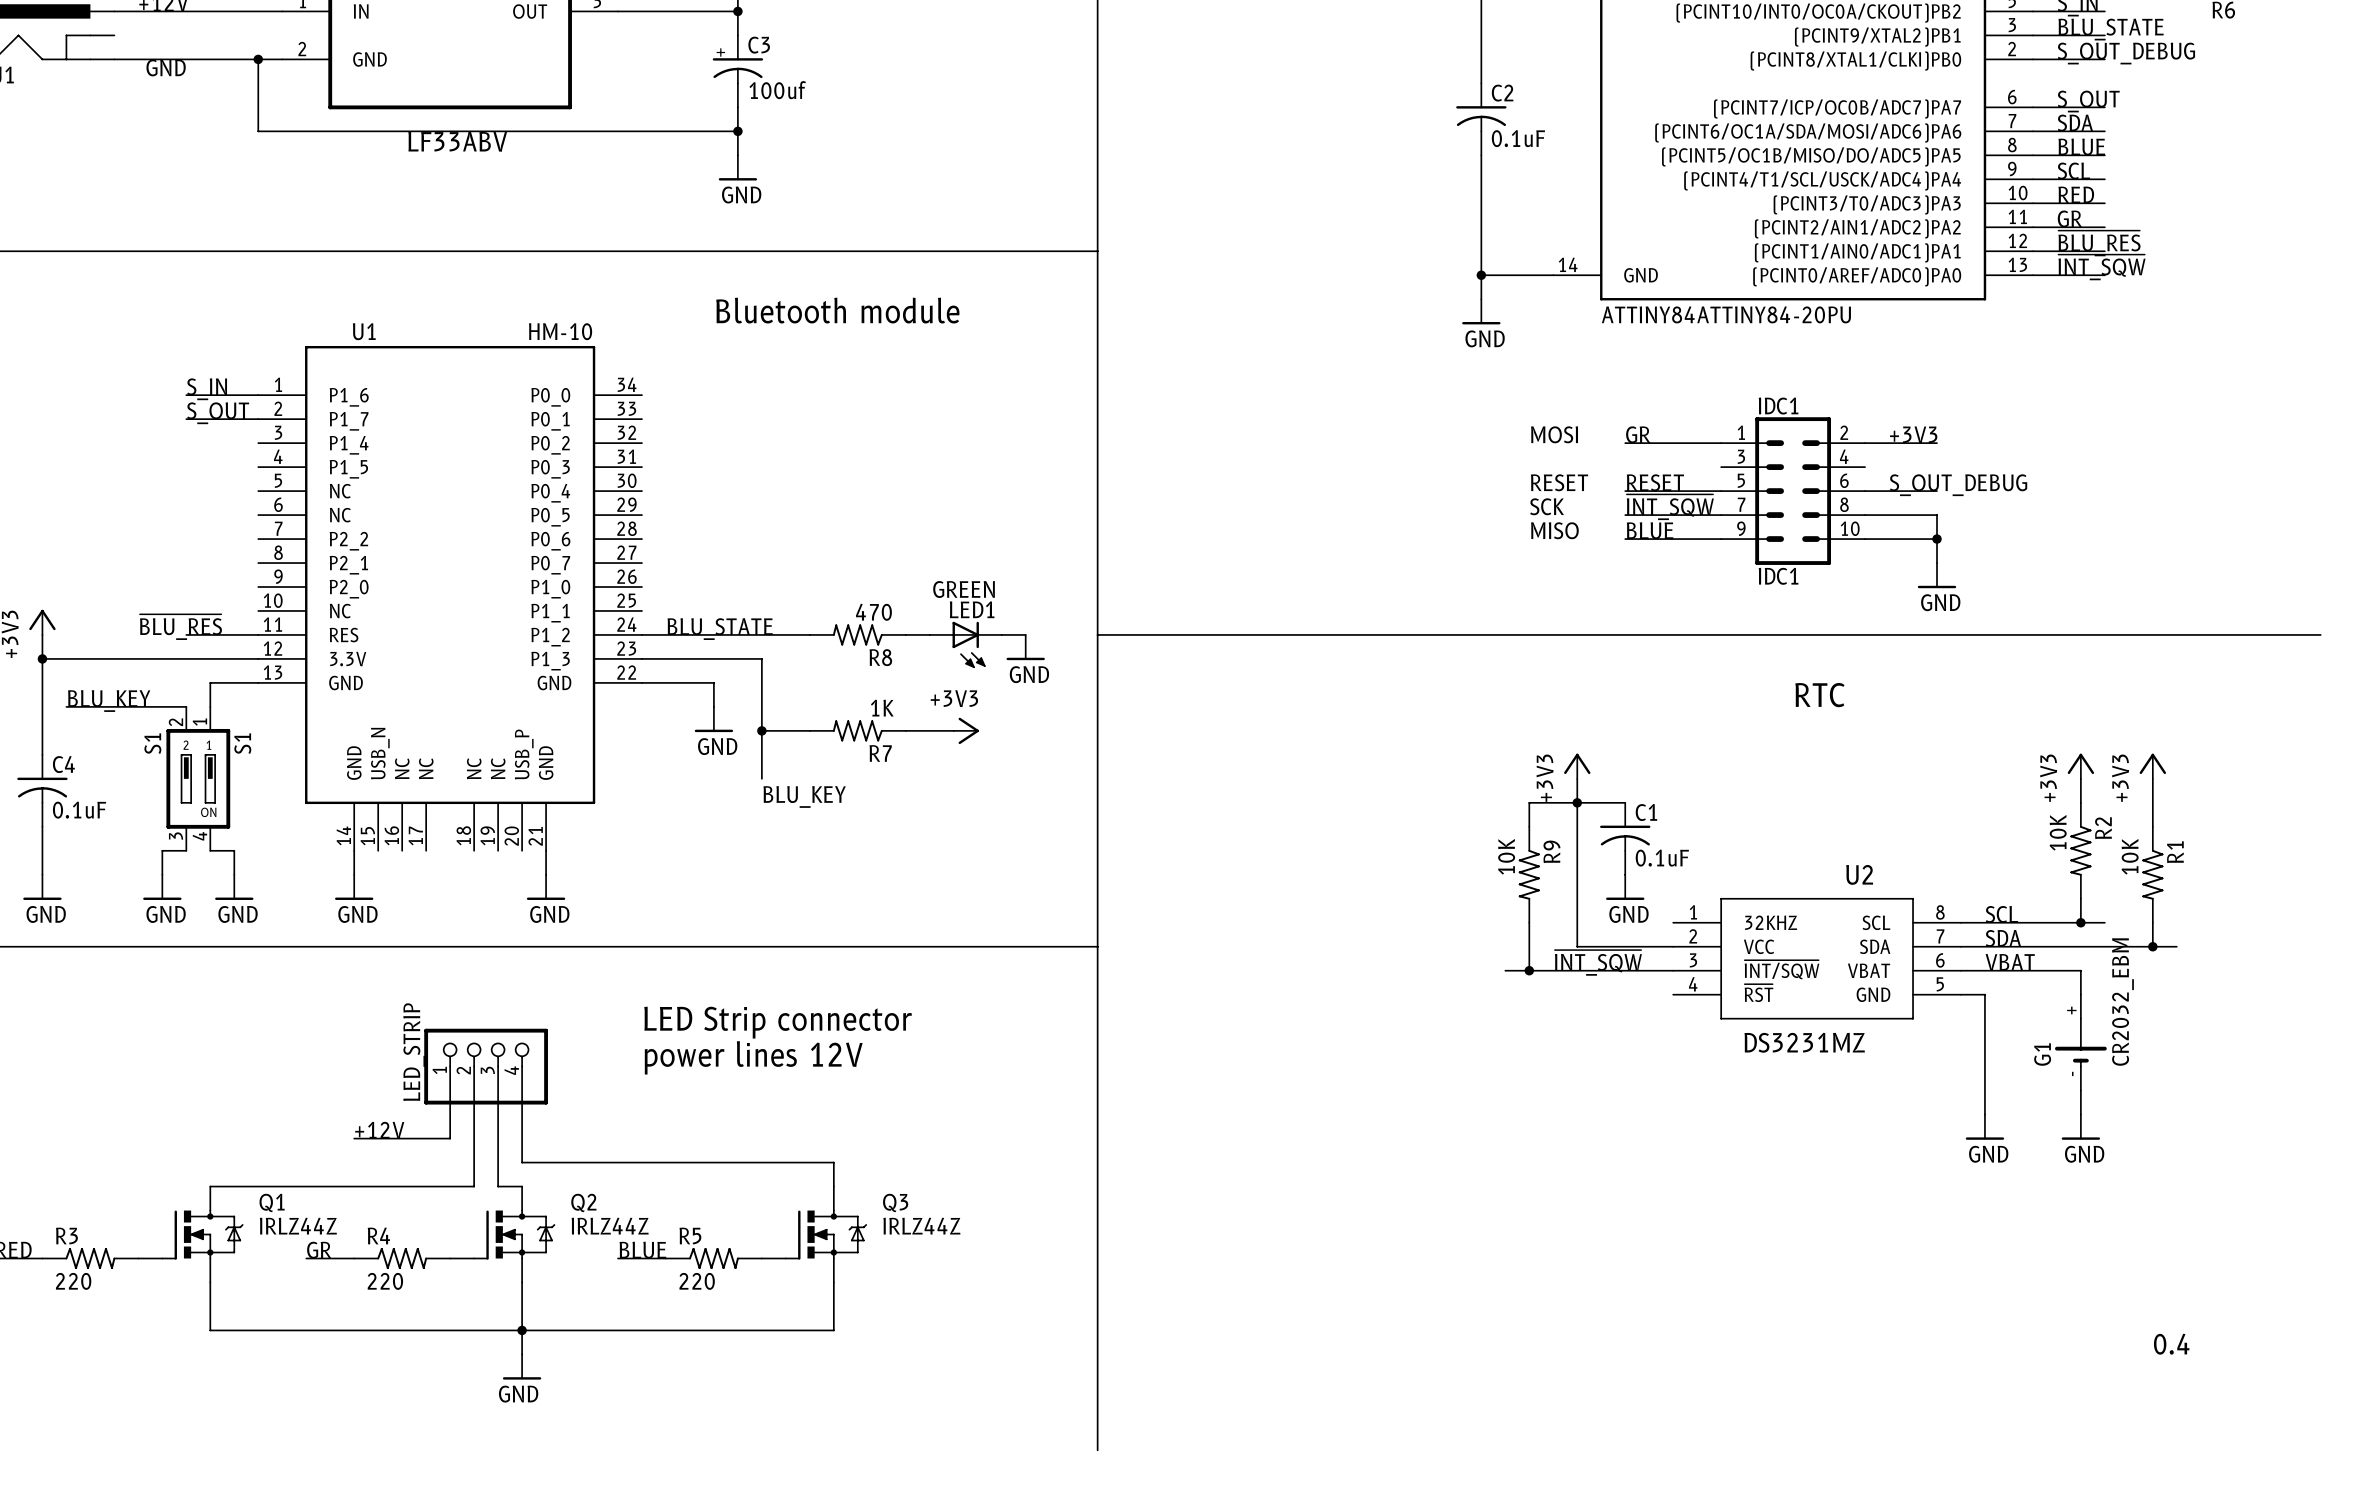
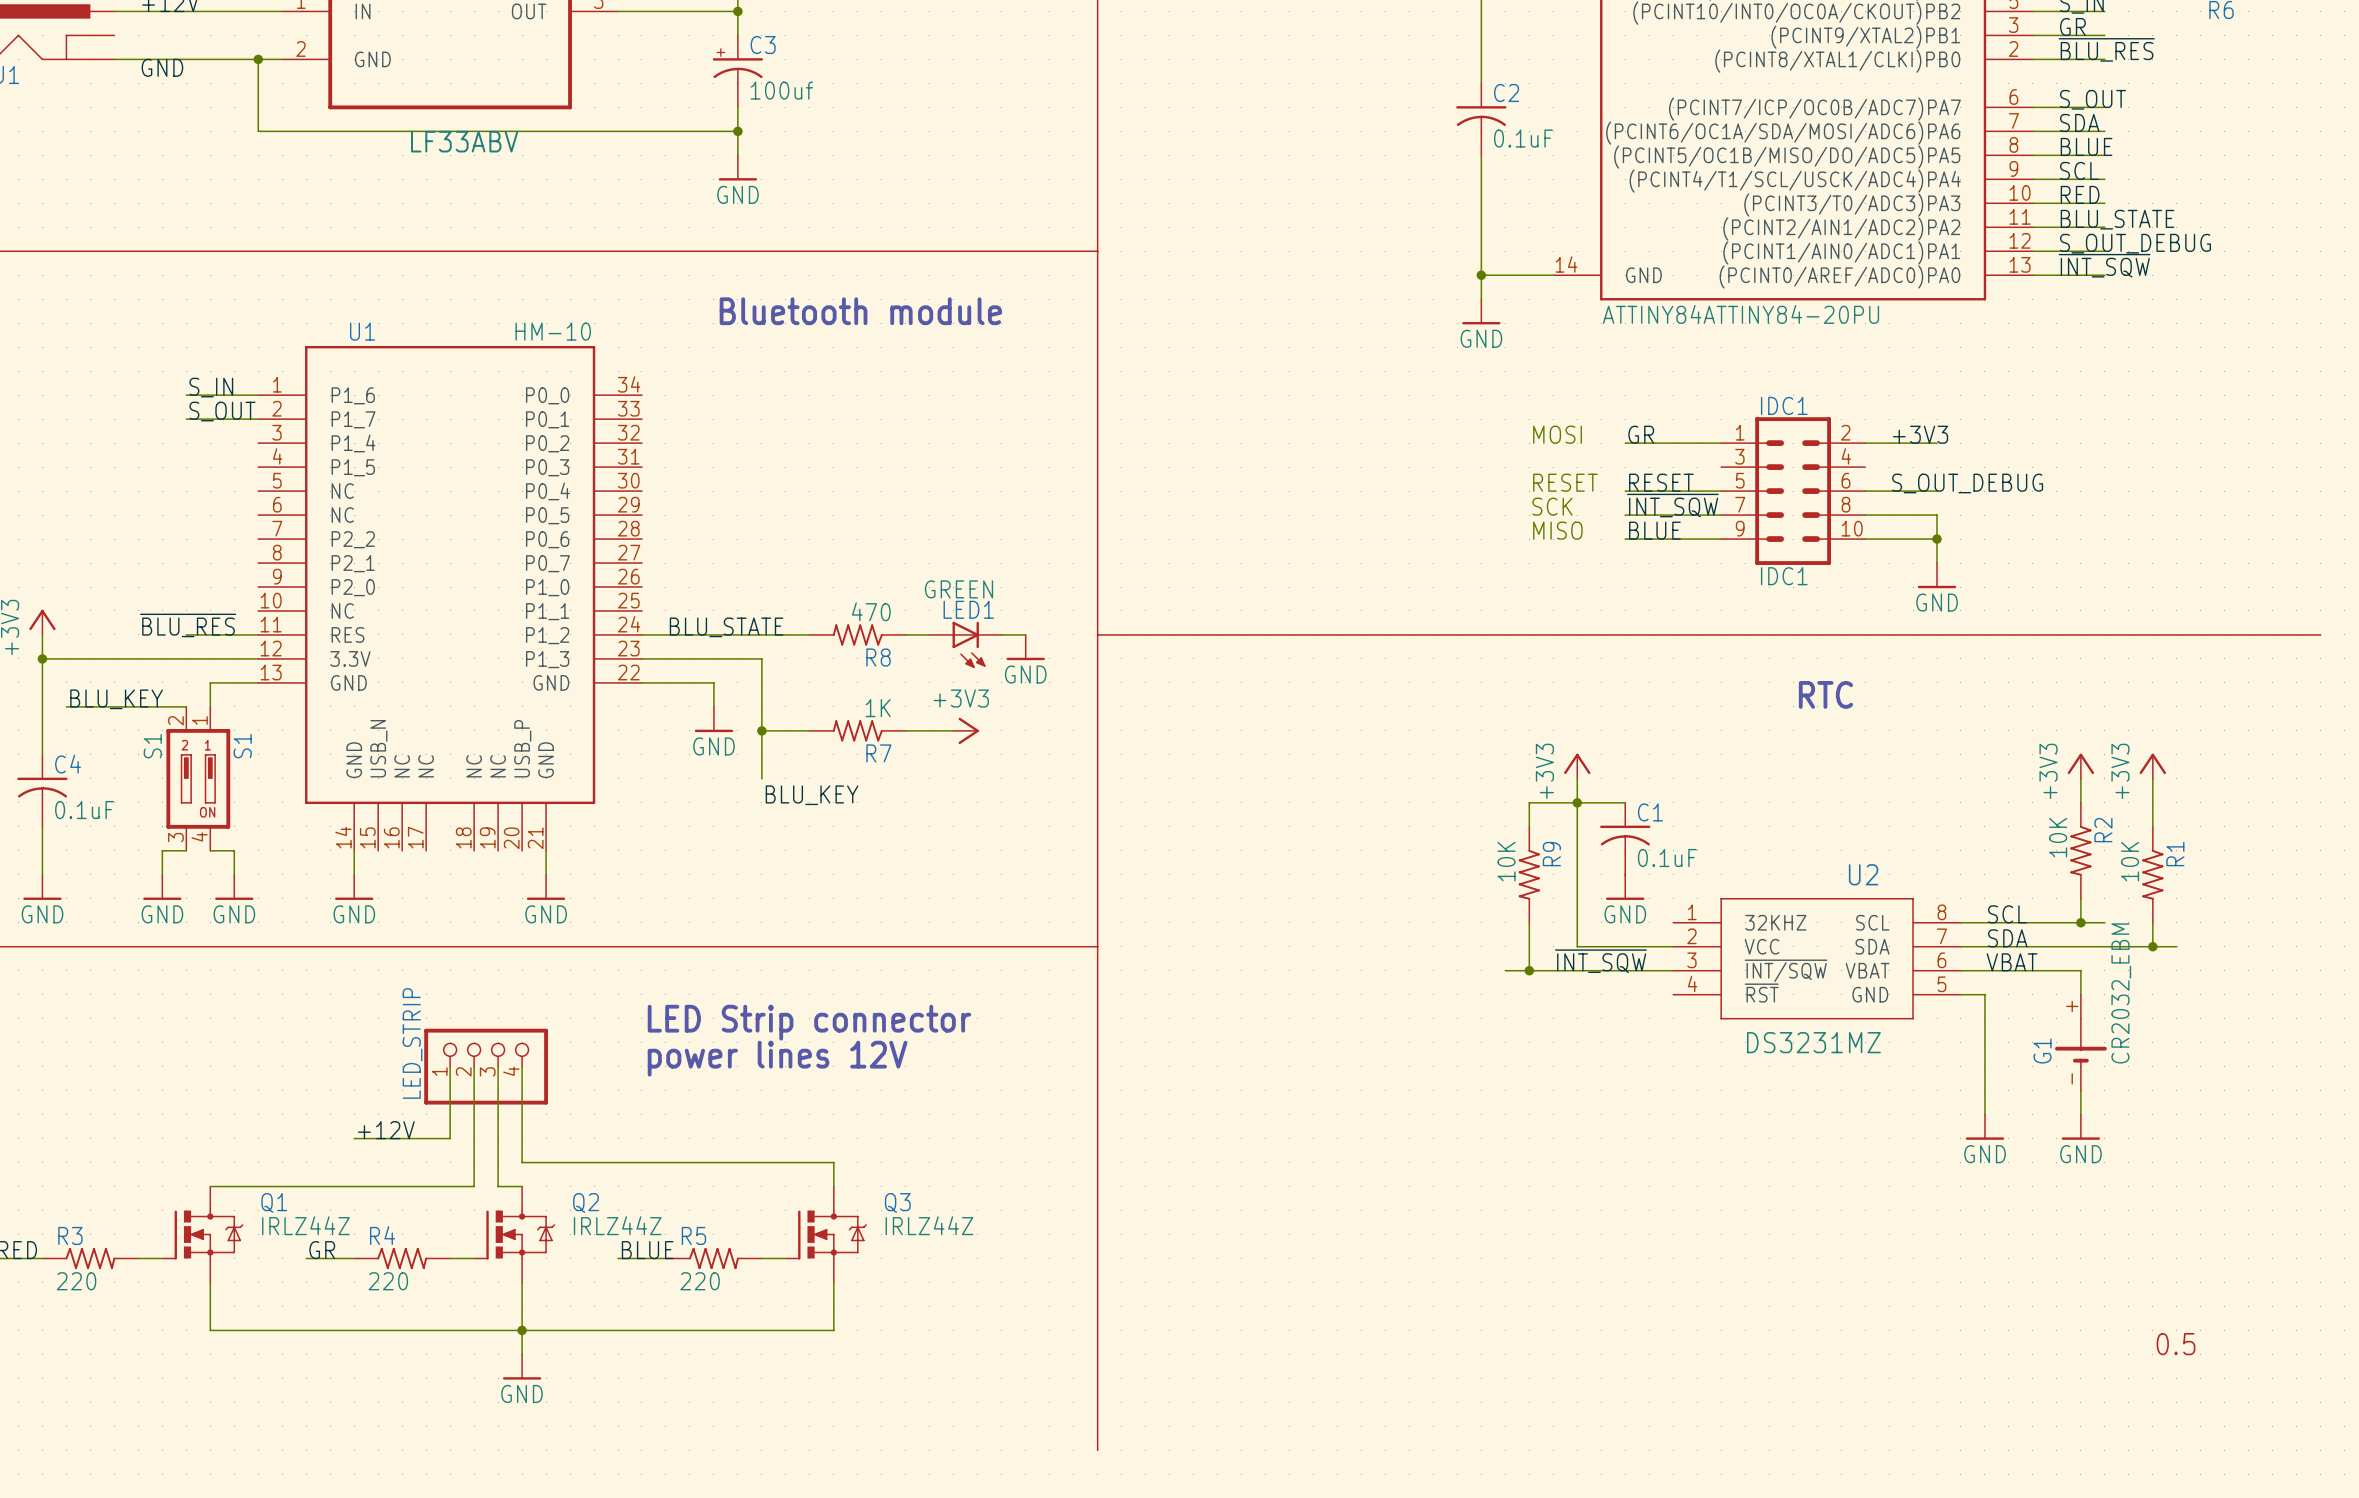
label: BLU_STATE (2111, 29) -> GR (2072, 27)
label: S_OUT_DEBUG (2126, 53) -> ~{BLU_RES} (2106, 49)
label: GR (2069, 218) -> BLU_STATE (2117, 219)
label: ~{BLU_RES} (2099, 243) -> S_OUT_DEBUG (2135, 243)
text: 0.4 (2171, 1344) -> 0.5 (2176, 1344)

